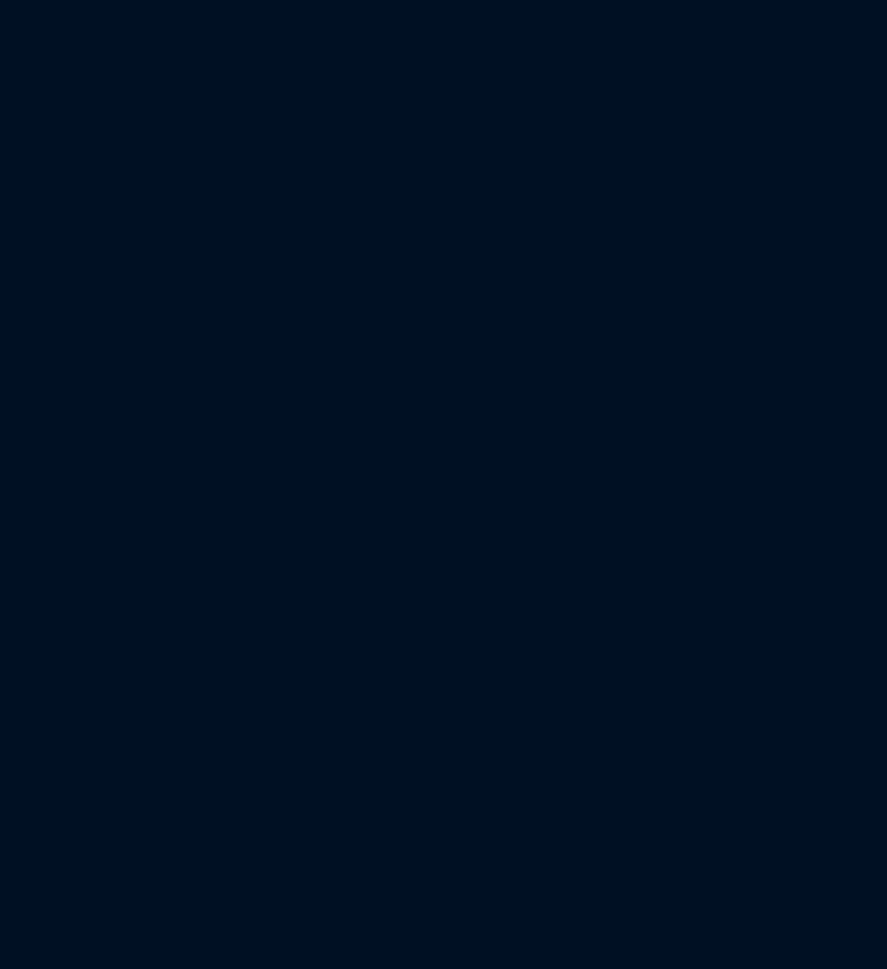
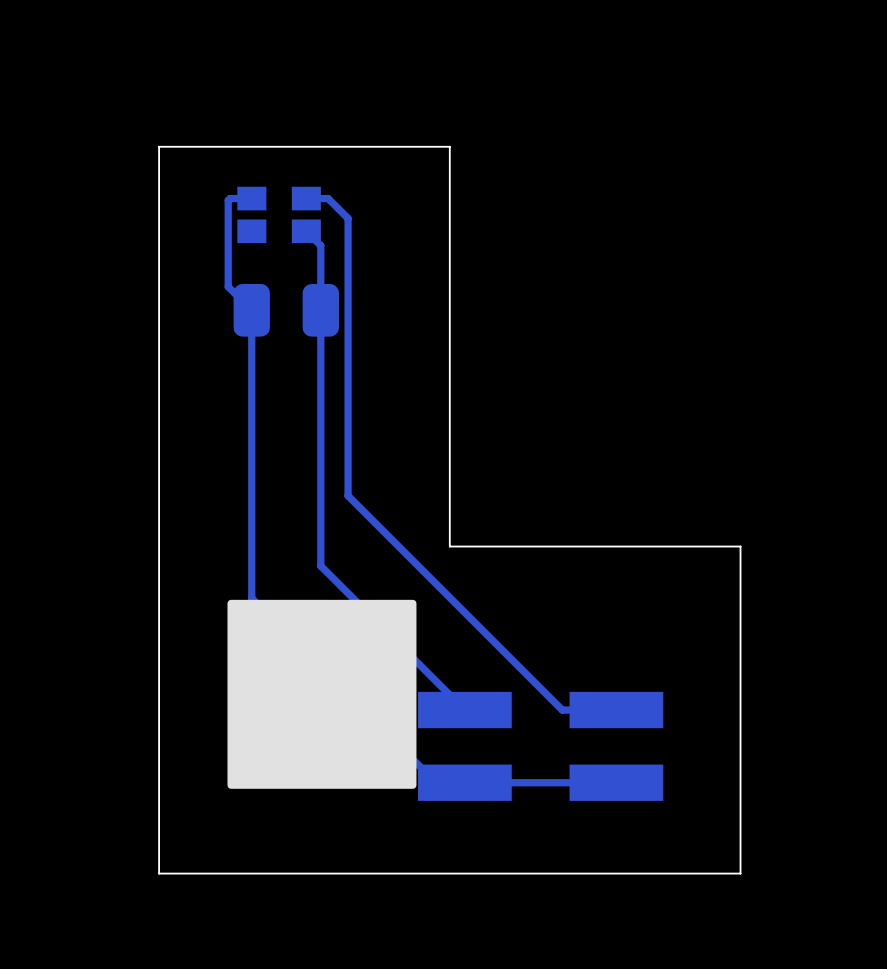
board edge: none -> (159, 146) (449, 146) (449, 546) (740, 546) (740, 873) (159, 873) (159, 146)
bottom track: none -> (251, 198) (230, 198) (228, 200) (228, 286) (251, 310) (251, 598) (436, 782) (616, 782)
bottom track: none -> (306, 198) (328, 198) (348, 218) (348, 495) (562, 710) (616, 710)
part: none -> (279, 214)
bottom track: none -> (306, 231) (320, 245) (320, 565) (464, 710)
part: none -> (286, 310)
drawing: none -> [227, 599, 417, 789]
part: none -> (540, 746)

